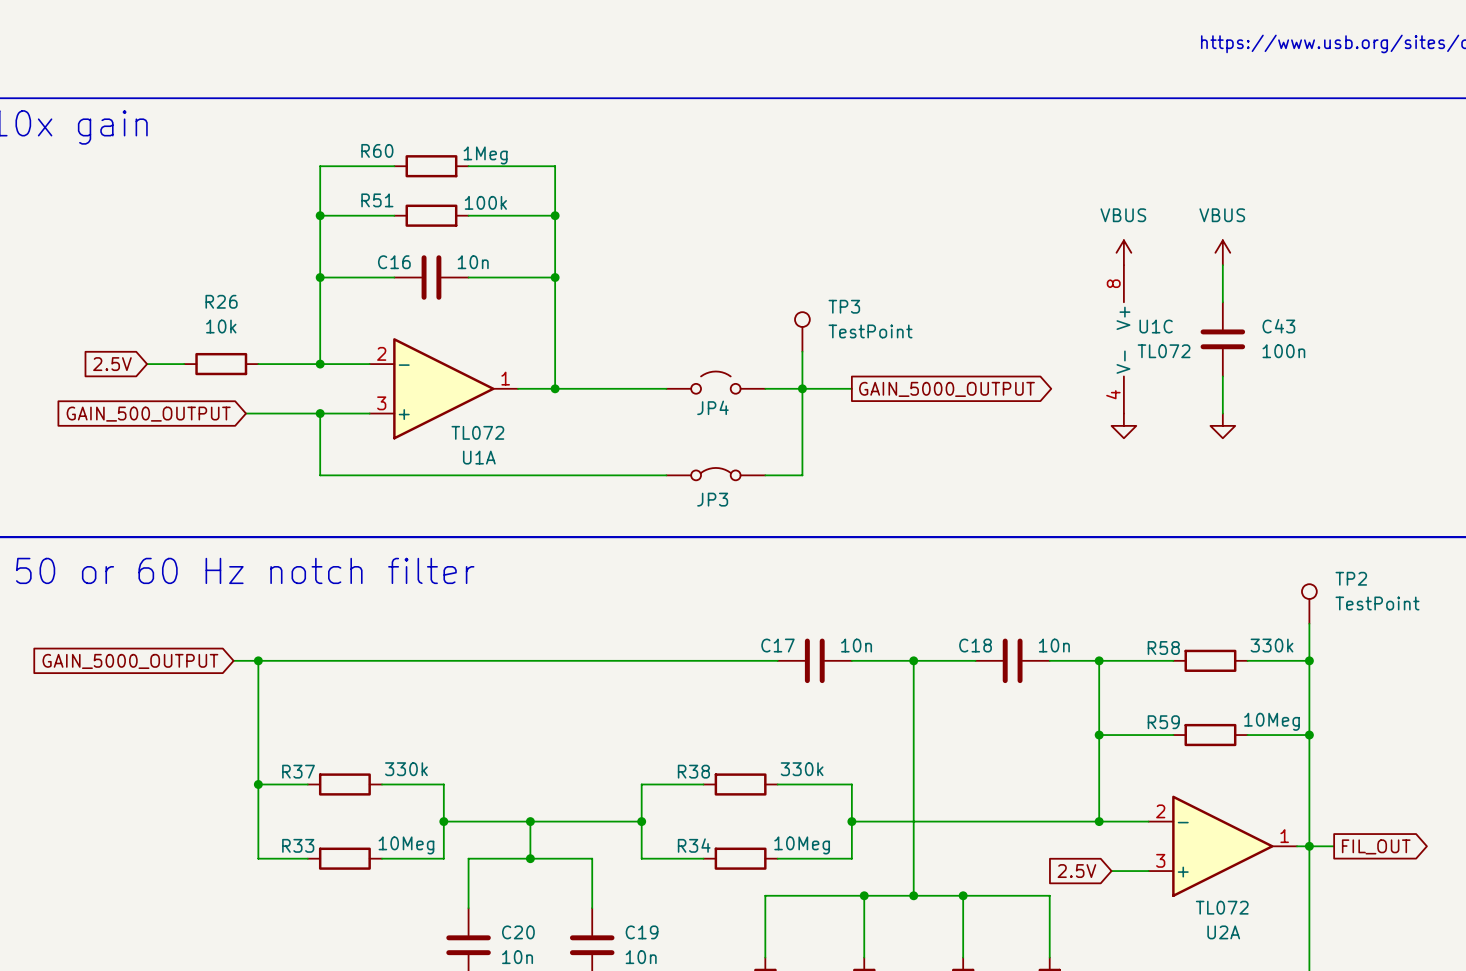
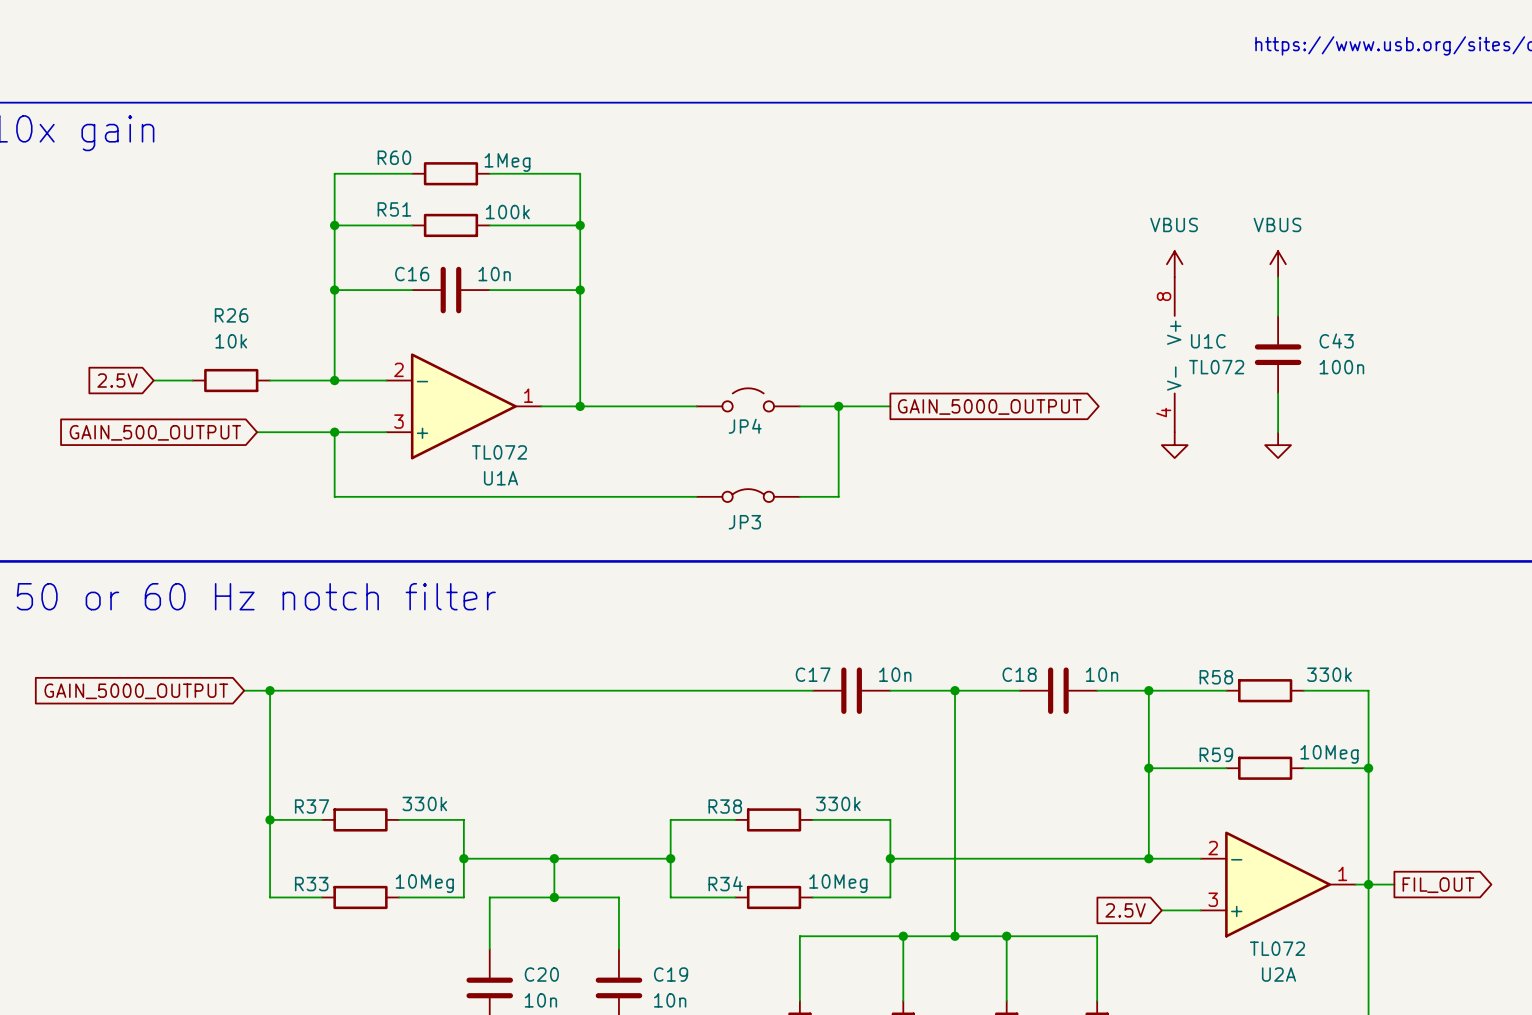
TP3: TestPoint (802, 331) -> none
wire: (802, 351) (802, 388) -> none
TP2: TestPoint (1309, 603) -> none
wire: (1309, 623) (1309, 660) -> none
junction: (1309, 660) -> none

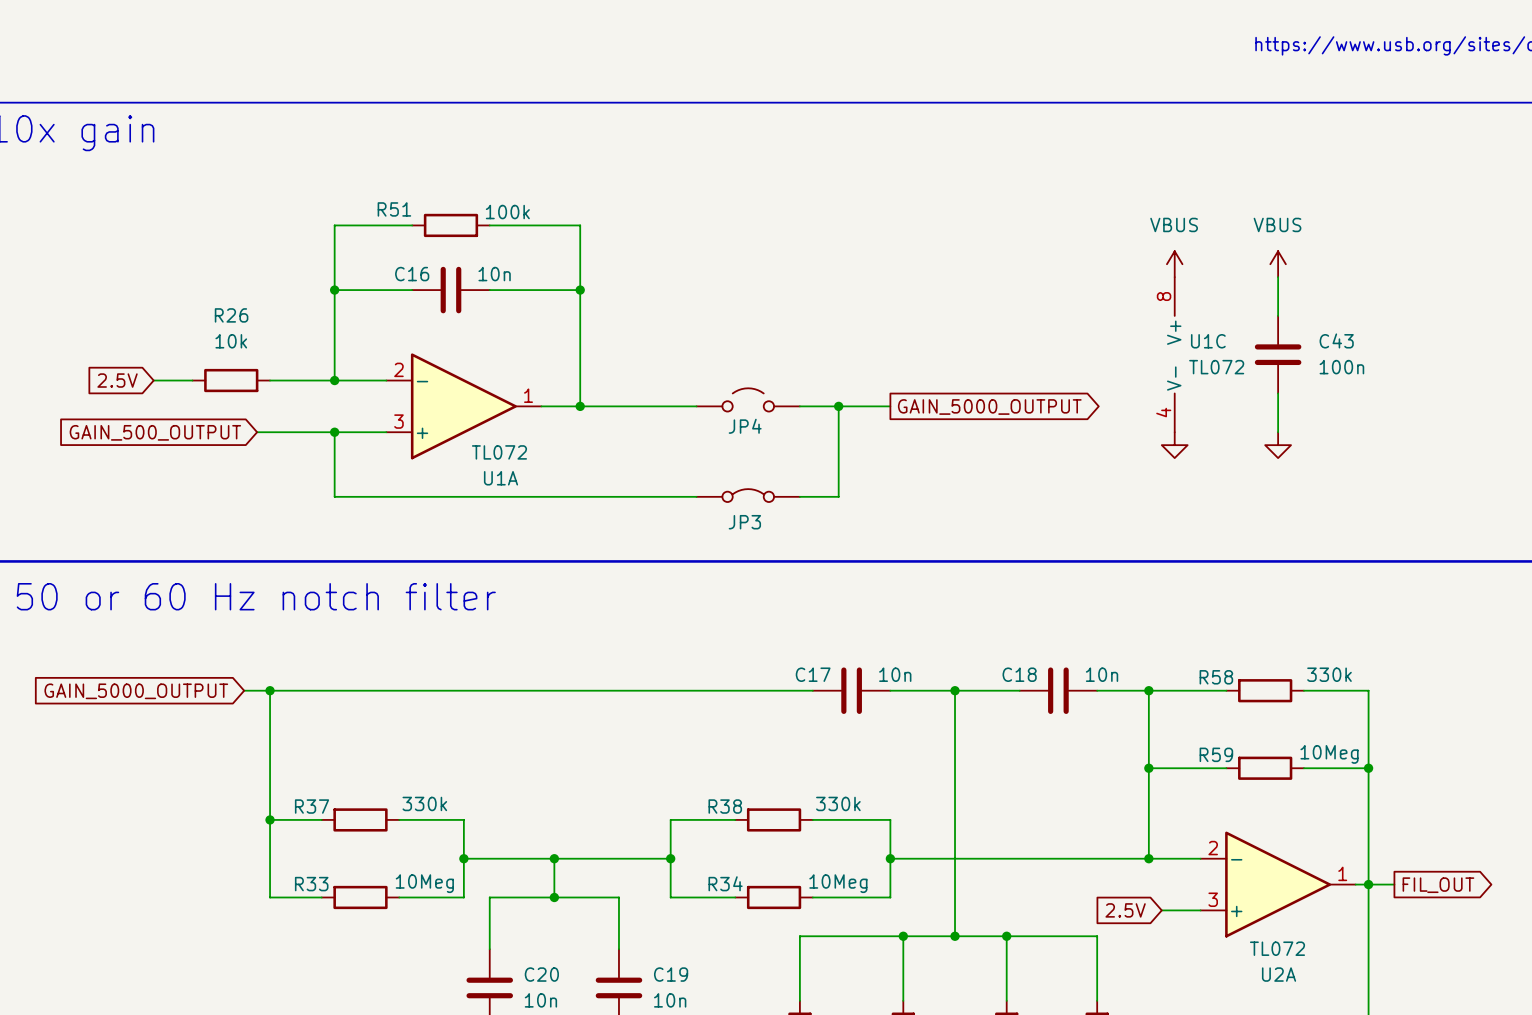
wire: (412, 173) (334, 173) (334, 225) -> none
R60: 1Meg (450, 173) -> none
wire: (489, 173) (580, 173) (580, 225) -> none
junction: (334, 225) -> none
junction: (580, 225) -> none

